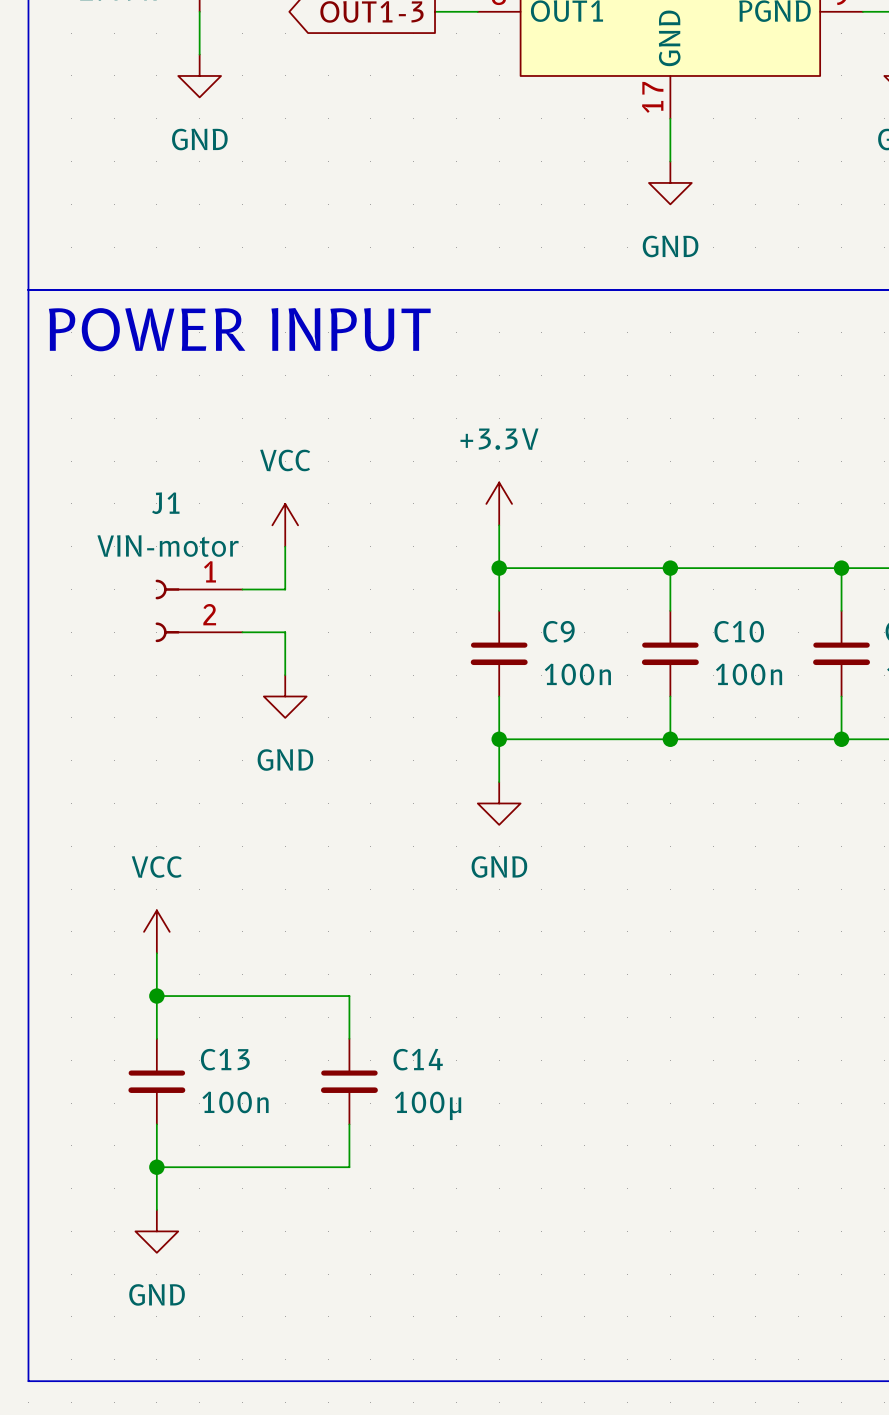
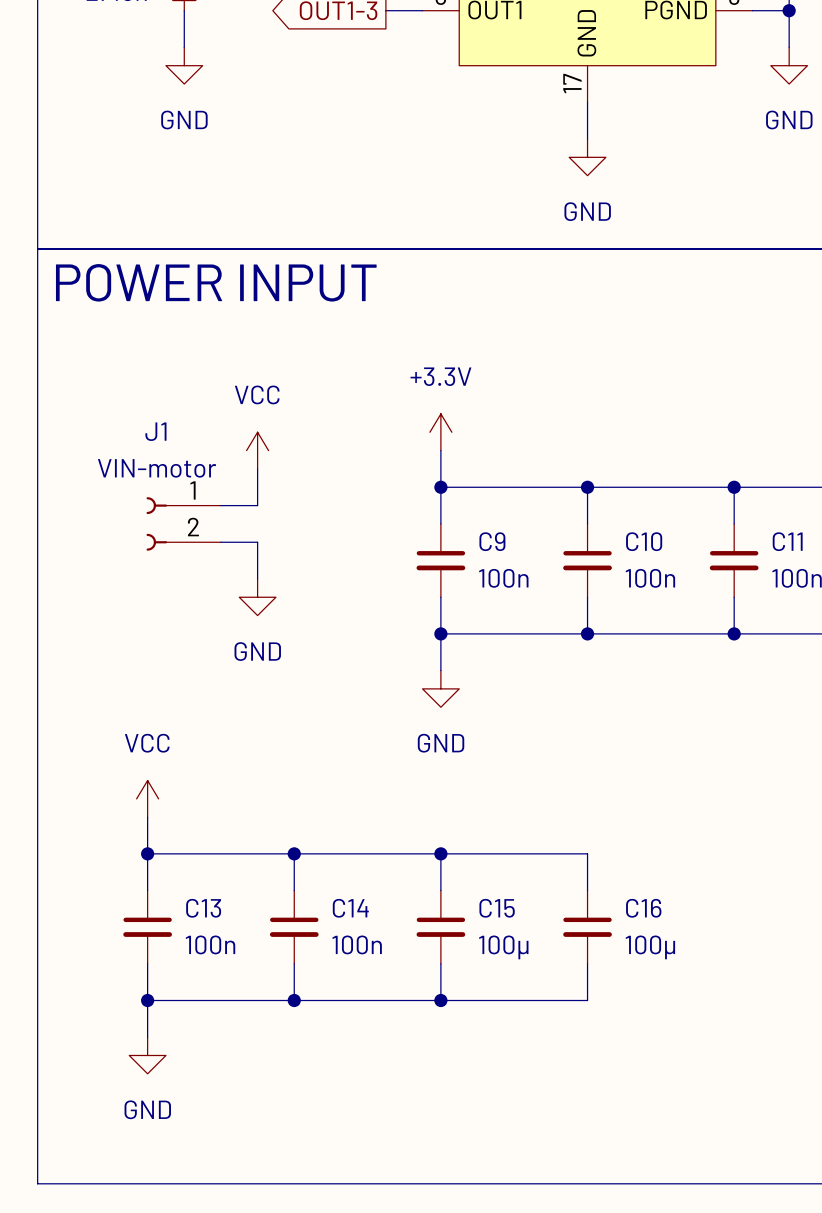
wire: none -> (294, 853) (294, 890)
junction: none -> (294, 853)
wire: (349, 996) (349, 1038) -> (312, 853) (587, 853) (587, 890)
wire: none -> (440, 853) (440, 890)
junction: none -> (440, 853)
C14 position: (349, 1081) -> (294, 927)
C15: none -> 100μ (440, 927)
C16: none -> 100μ (587, 927)
C14 value: 100μ (428, 1105) -> 100n (357, 944)
wire: none -> (294, 963) (294, 1000)
wire: (349, 1124) (349, 1167) -> (587, 963) (587, 1000) (312, 1000)
wire: none -> (440, 963) (440, 1000)
junction: none -> (294, 1000)
junction: none -> (440, 1000)

